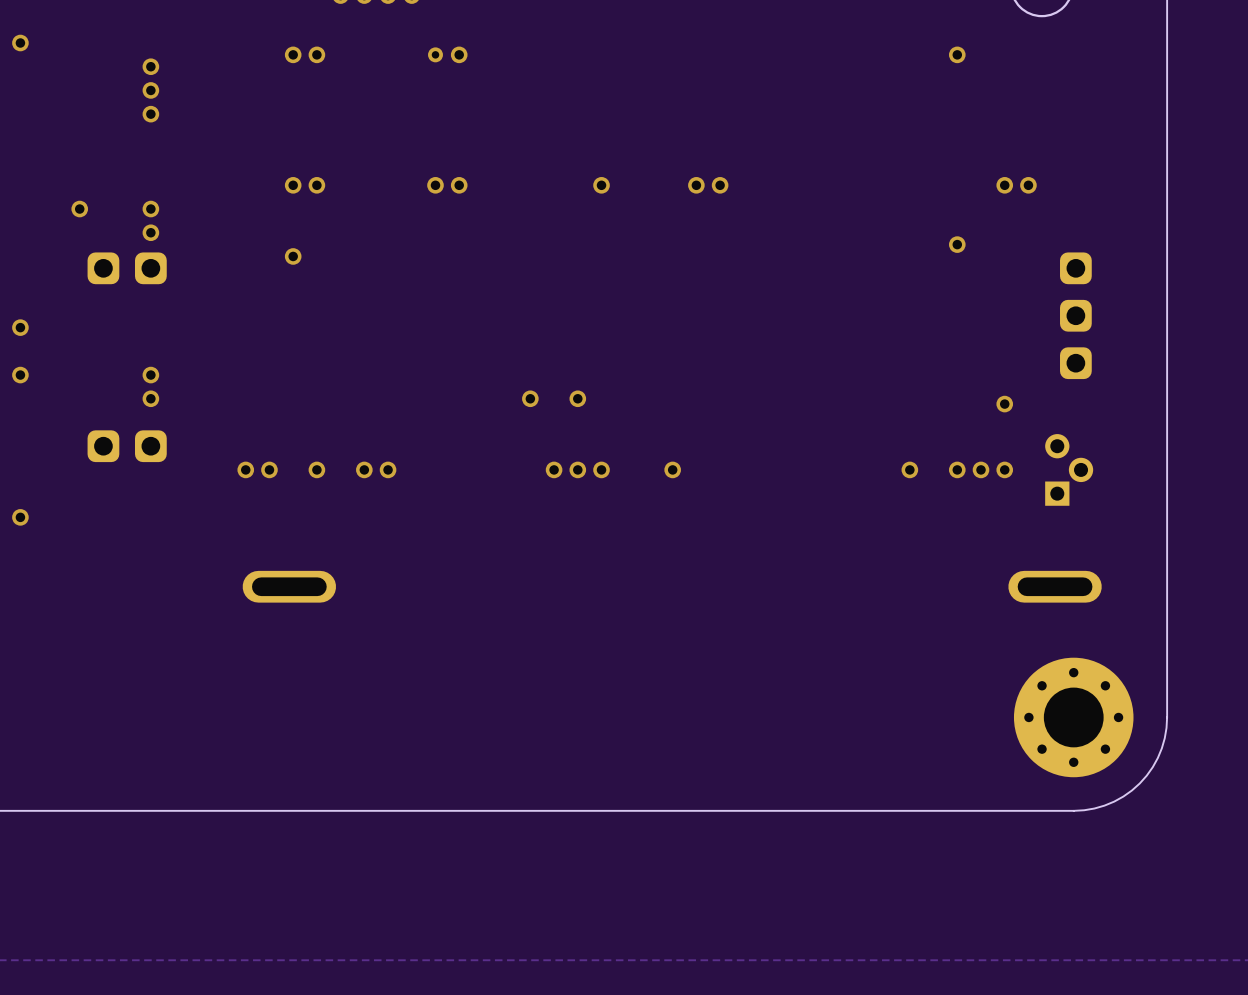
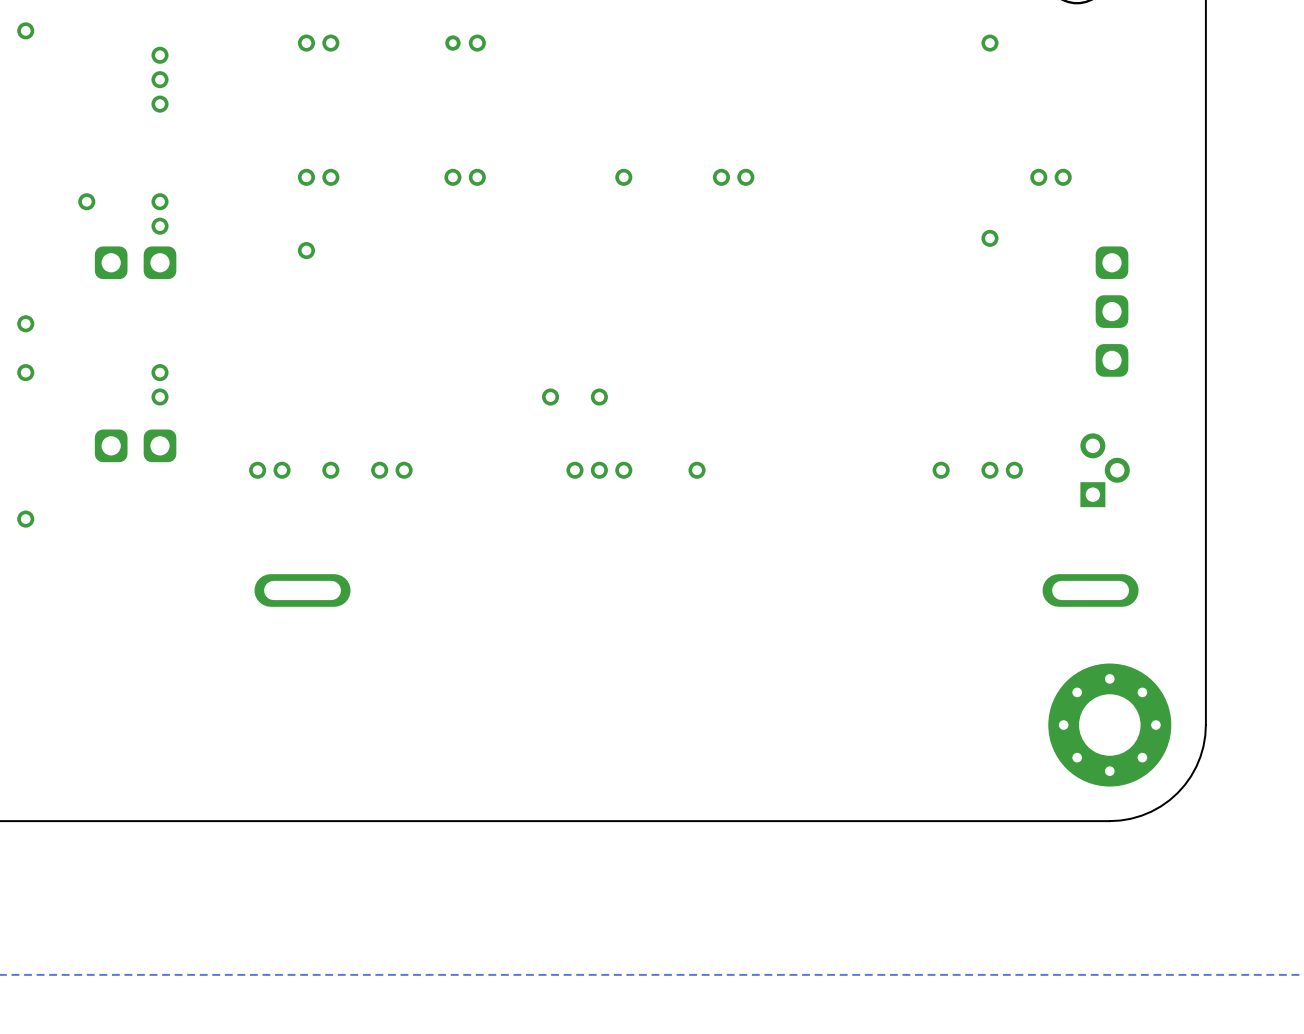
via: (1004, 404) -> none
via: (1004, 469) -> none

